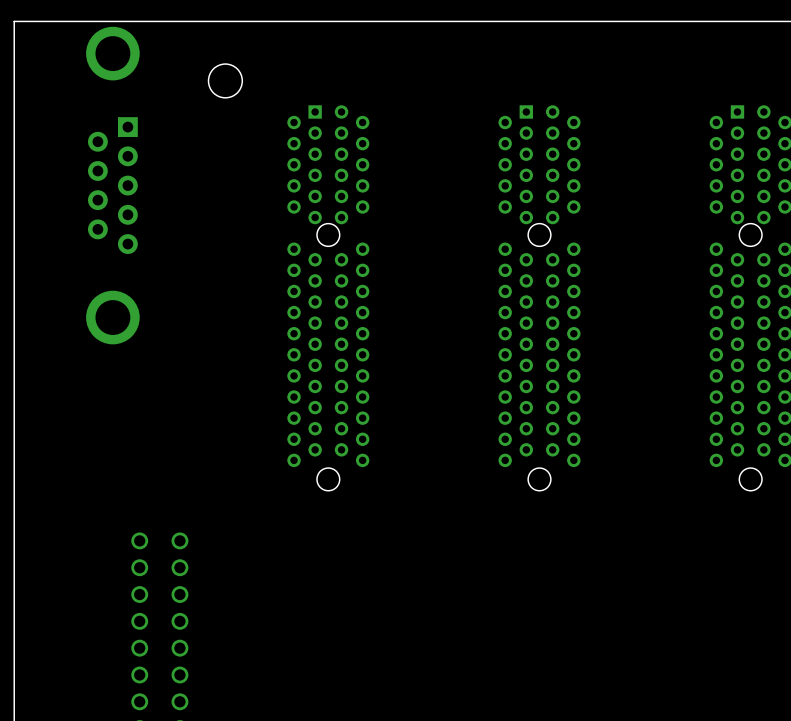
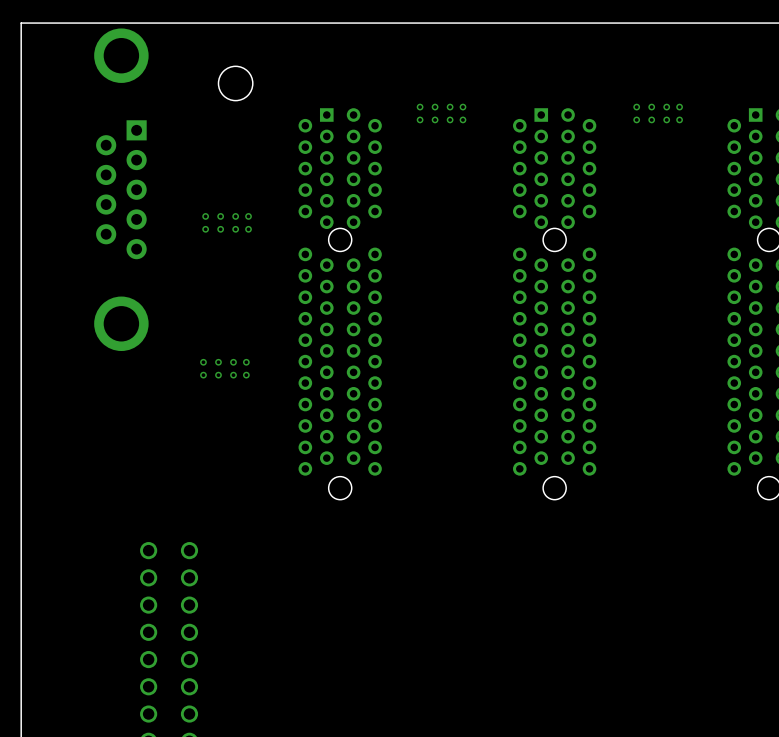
via: none -> (420, 107)
via: none -> (435, 107)
via: none -> (450, 107)
via: none -> (462, 107)
via: none -> (636, 107)
via: none -> (651, 107)
via: none -> (666, 107)
via: none -> (679, 107)
via: none -> (420, 119)
via: none -> (435, 119)
via: none -> (450, 119)
via: none -> (462, 119)
via: none -> (636, 119)
via: none -> (651, 119)
via: none -> (666, 119)
via: none -> (679, 119)
via: none -> (205, 216)
via: none -> (220, 216)
via: none -> (235, 216)
via: none -> (248, 216)
via: none -> (205, 229)
via: none -> (220, 229)
via: none -> (235, 229)
via: none -> (248, 229)
via: none -> (203, 362)
via: none -> (218, 362)
via: none -> (233, 362)
via: none -> (246, 362)
via: none -> (203, 375)
via: none -> (218, 375)
via: none -> (233, 375)
via: none -> (246, 375)

